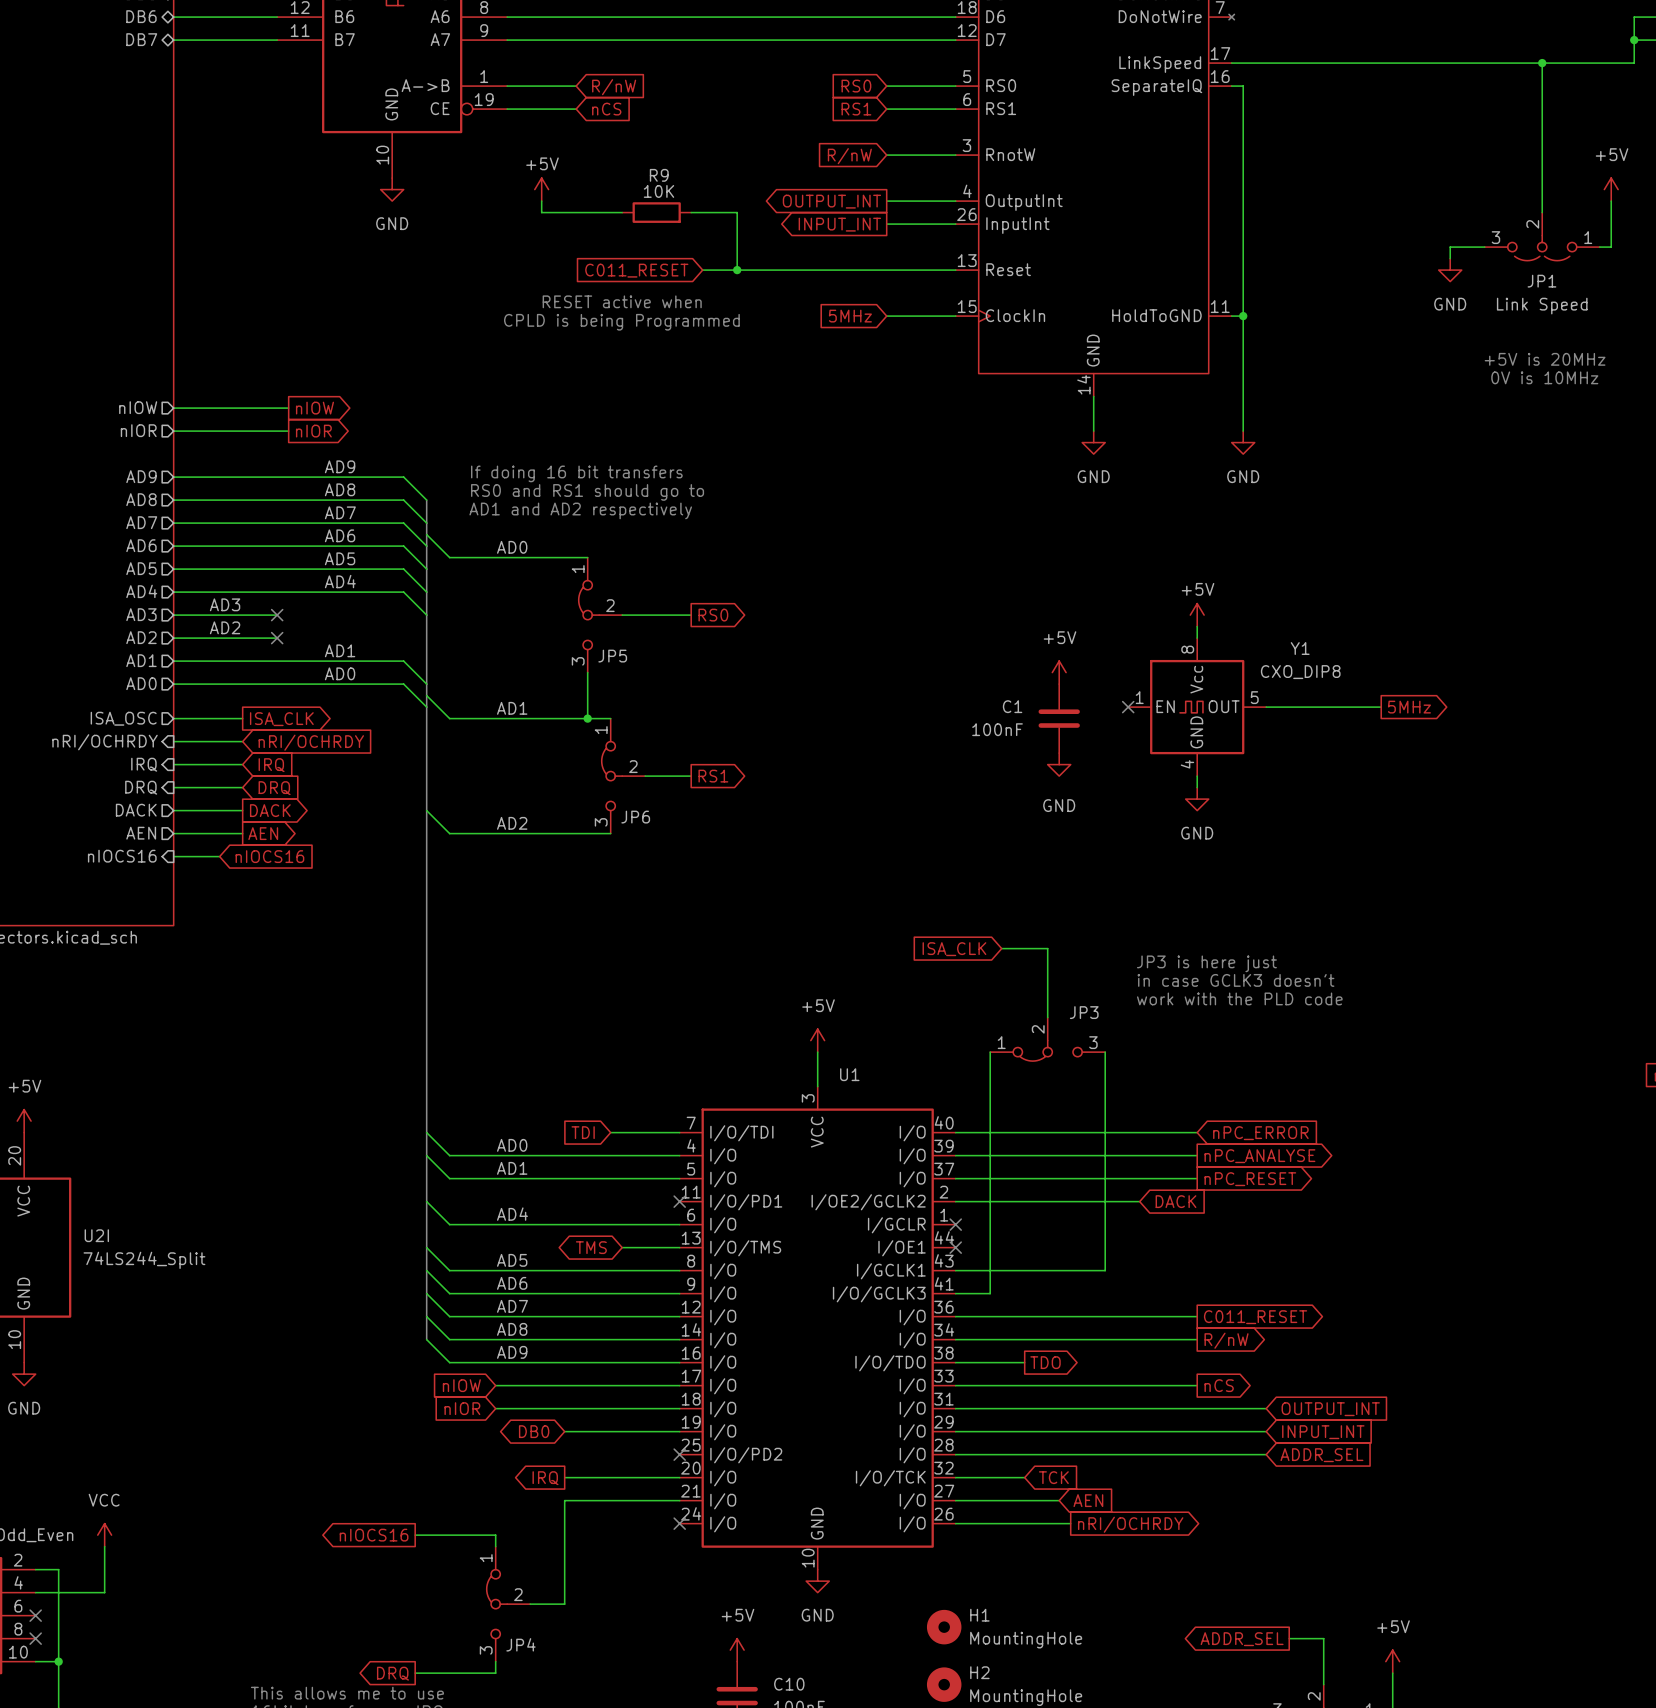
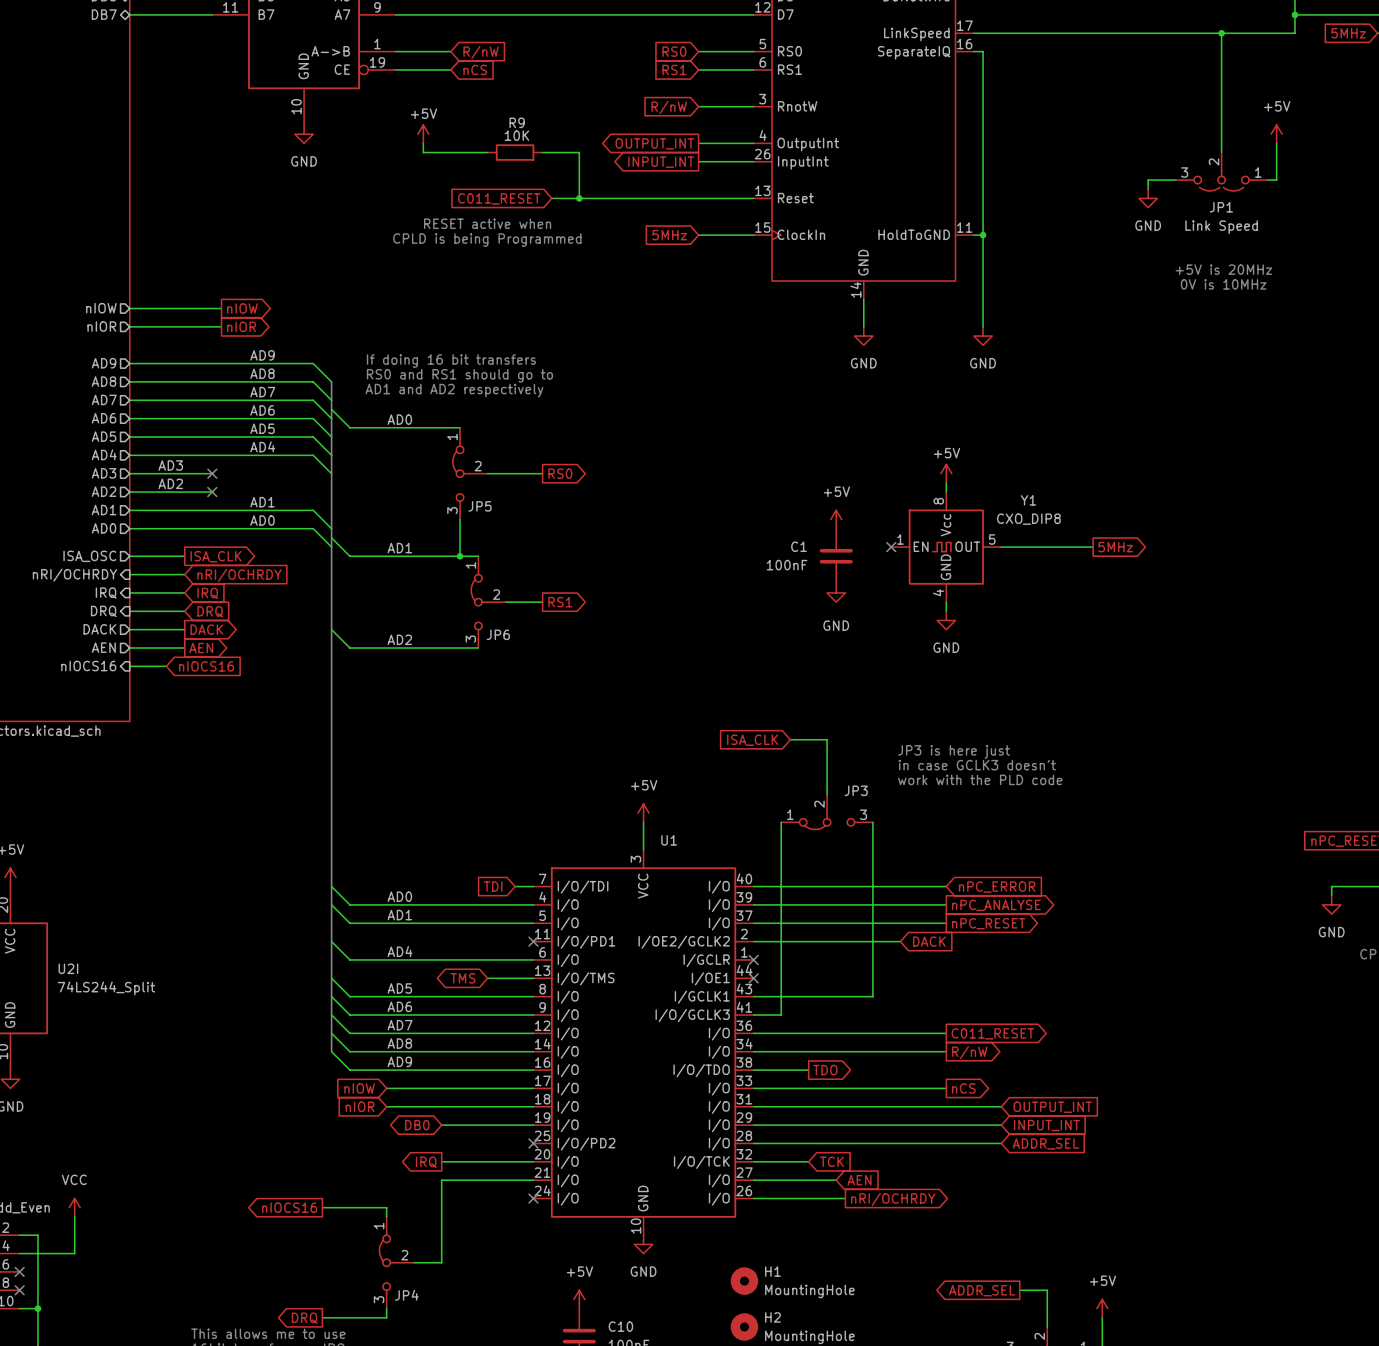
global label position: TDI (583, 1132) -> TDI (493, 886)
wire: (610, 1132) (656, 1132) -> none

